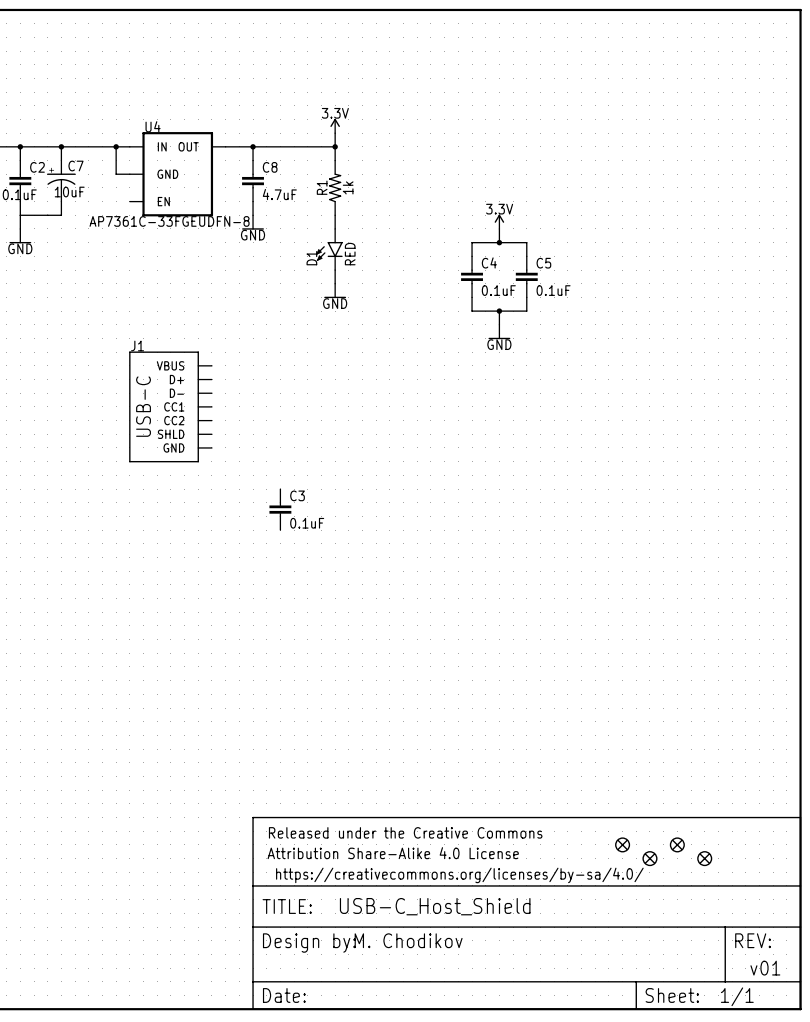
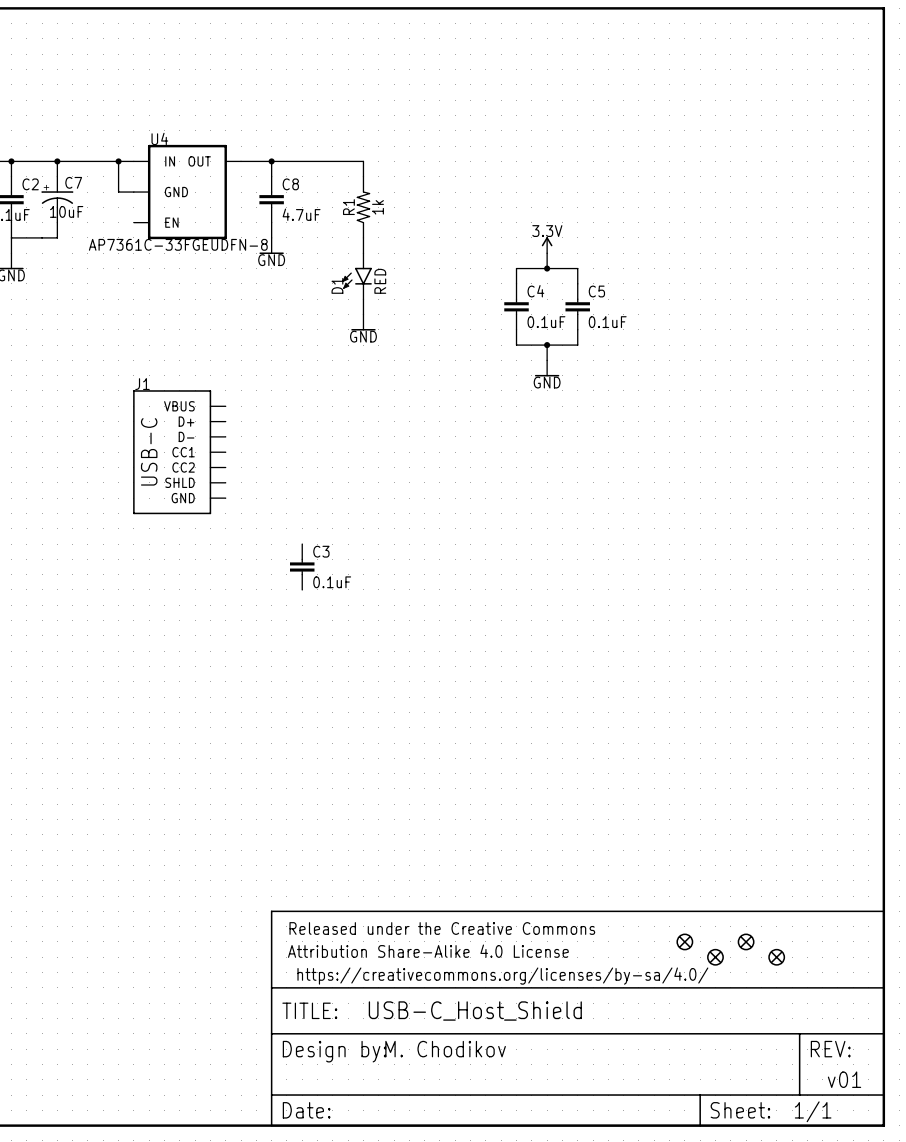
power symbol: 3.3V (335, 125) -> none
wire: (335, 133) (335, 146) -> none
junction: (335, 146) -> none

